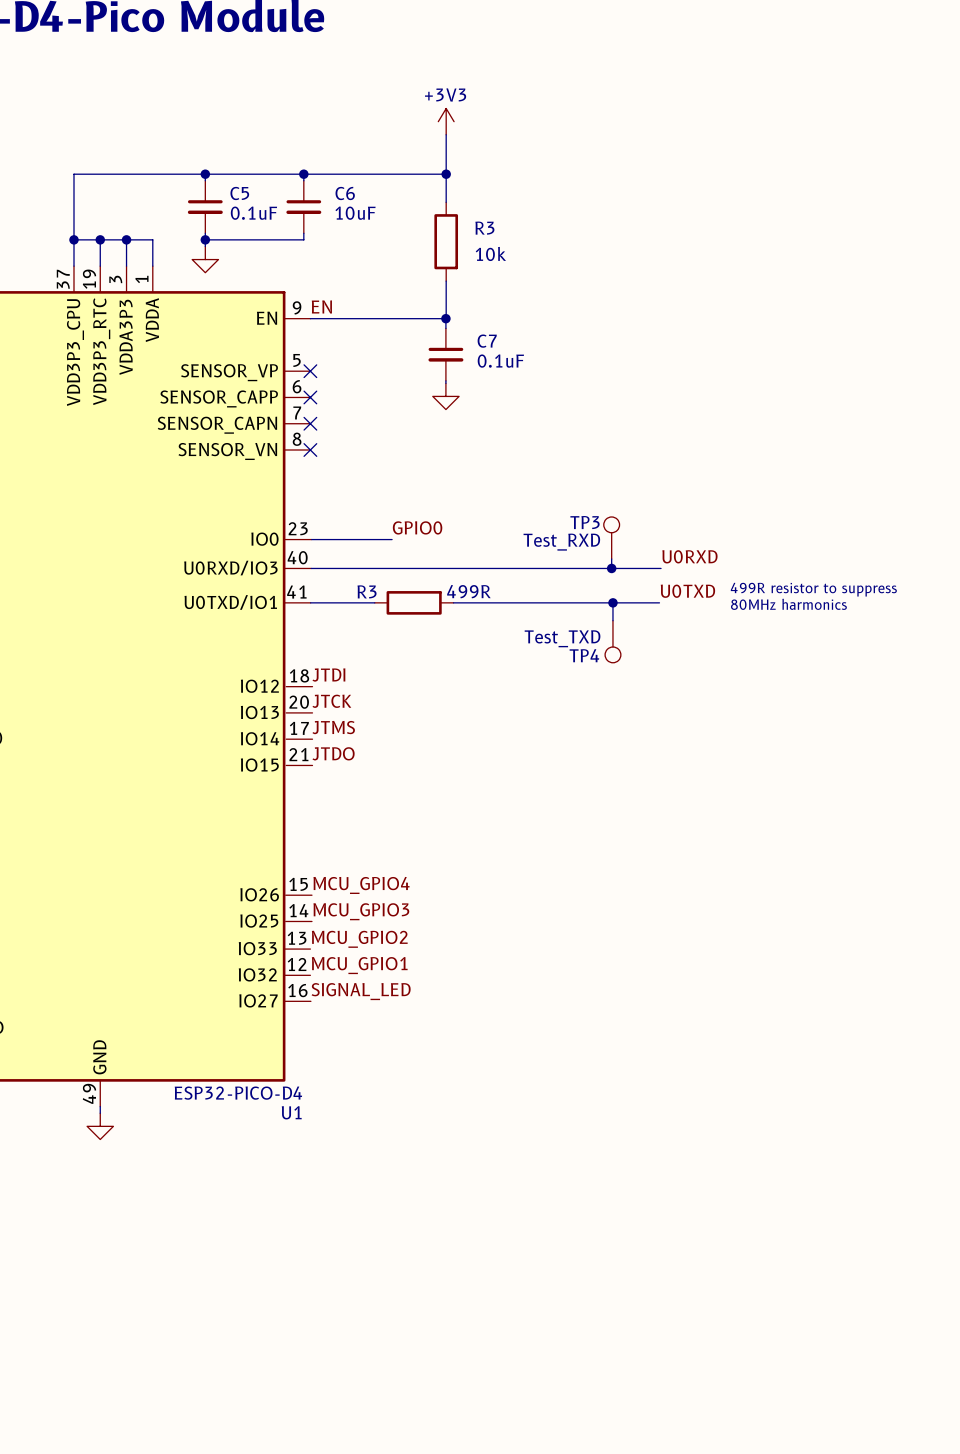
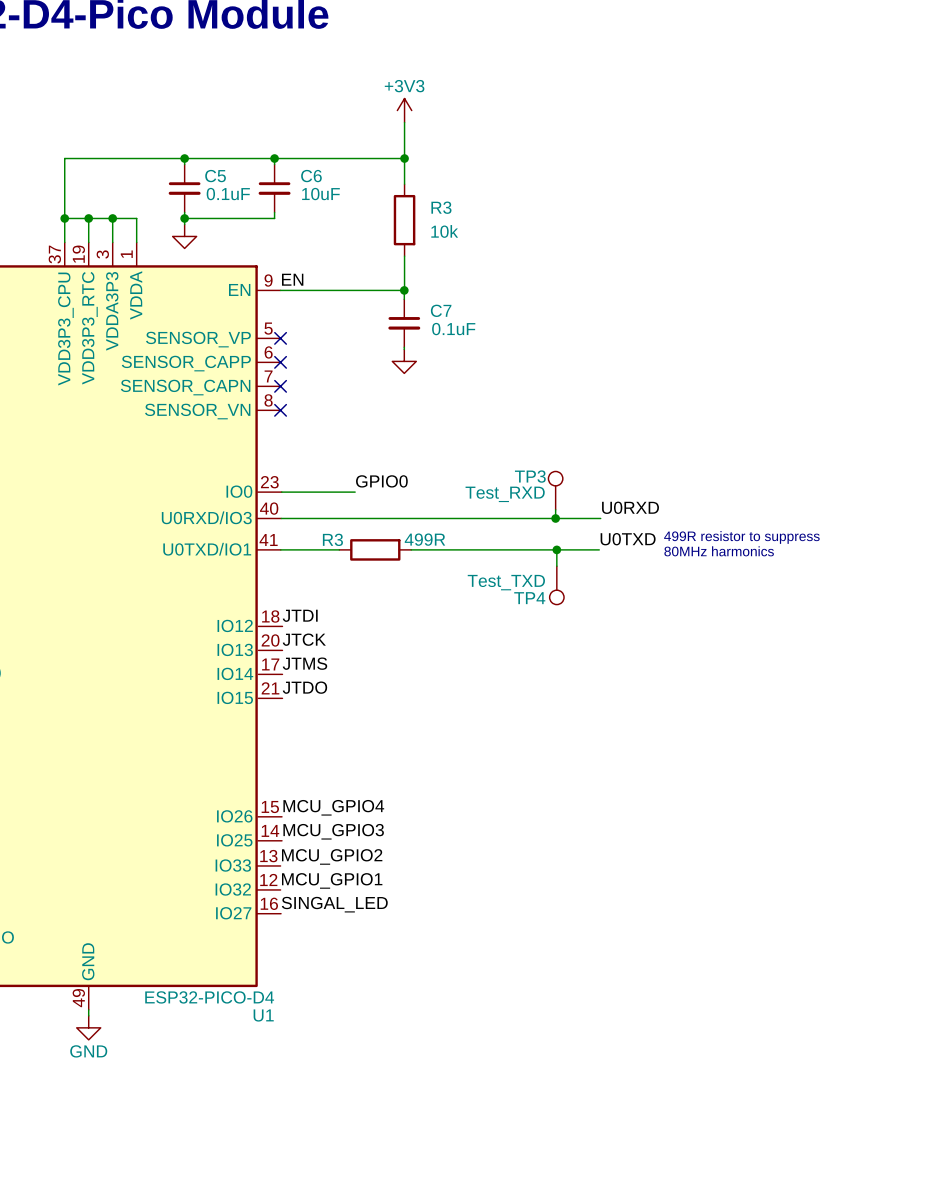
label: SIGNAL_LED (361, 991) -> SINGAL_LED (334, 904)
power symbol text: none -> GND (88, 1051)

